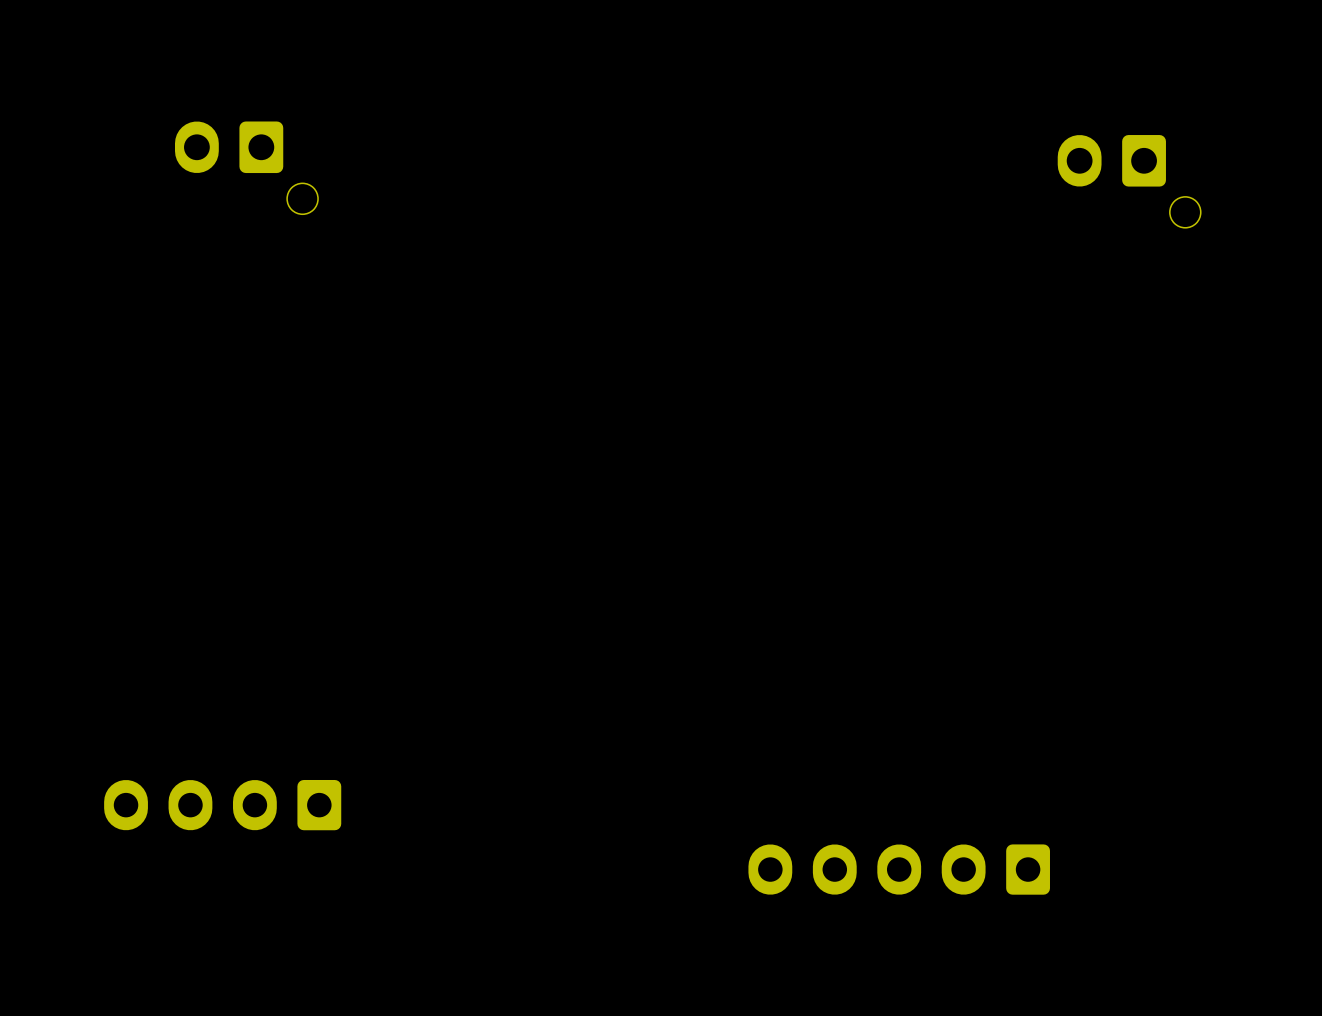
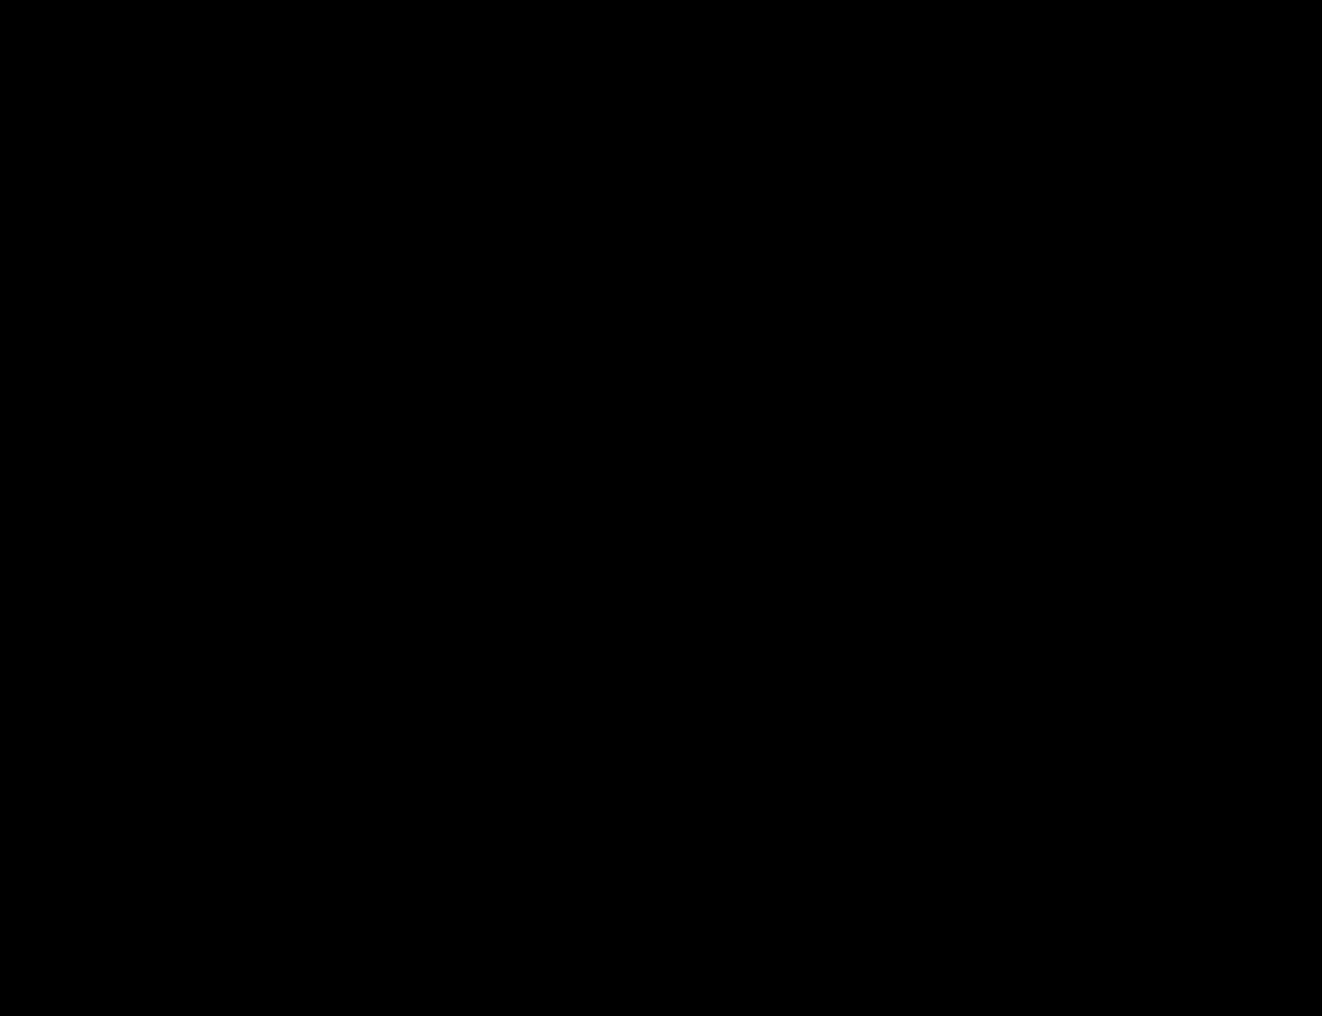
part: (246, 167) -> none
part: (1129, 181) -> none
part: (222, 805) -> none
part: (899, 869) -> none

